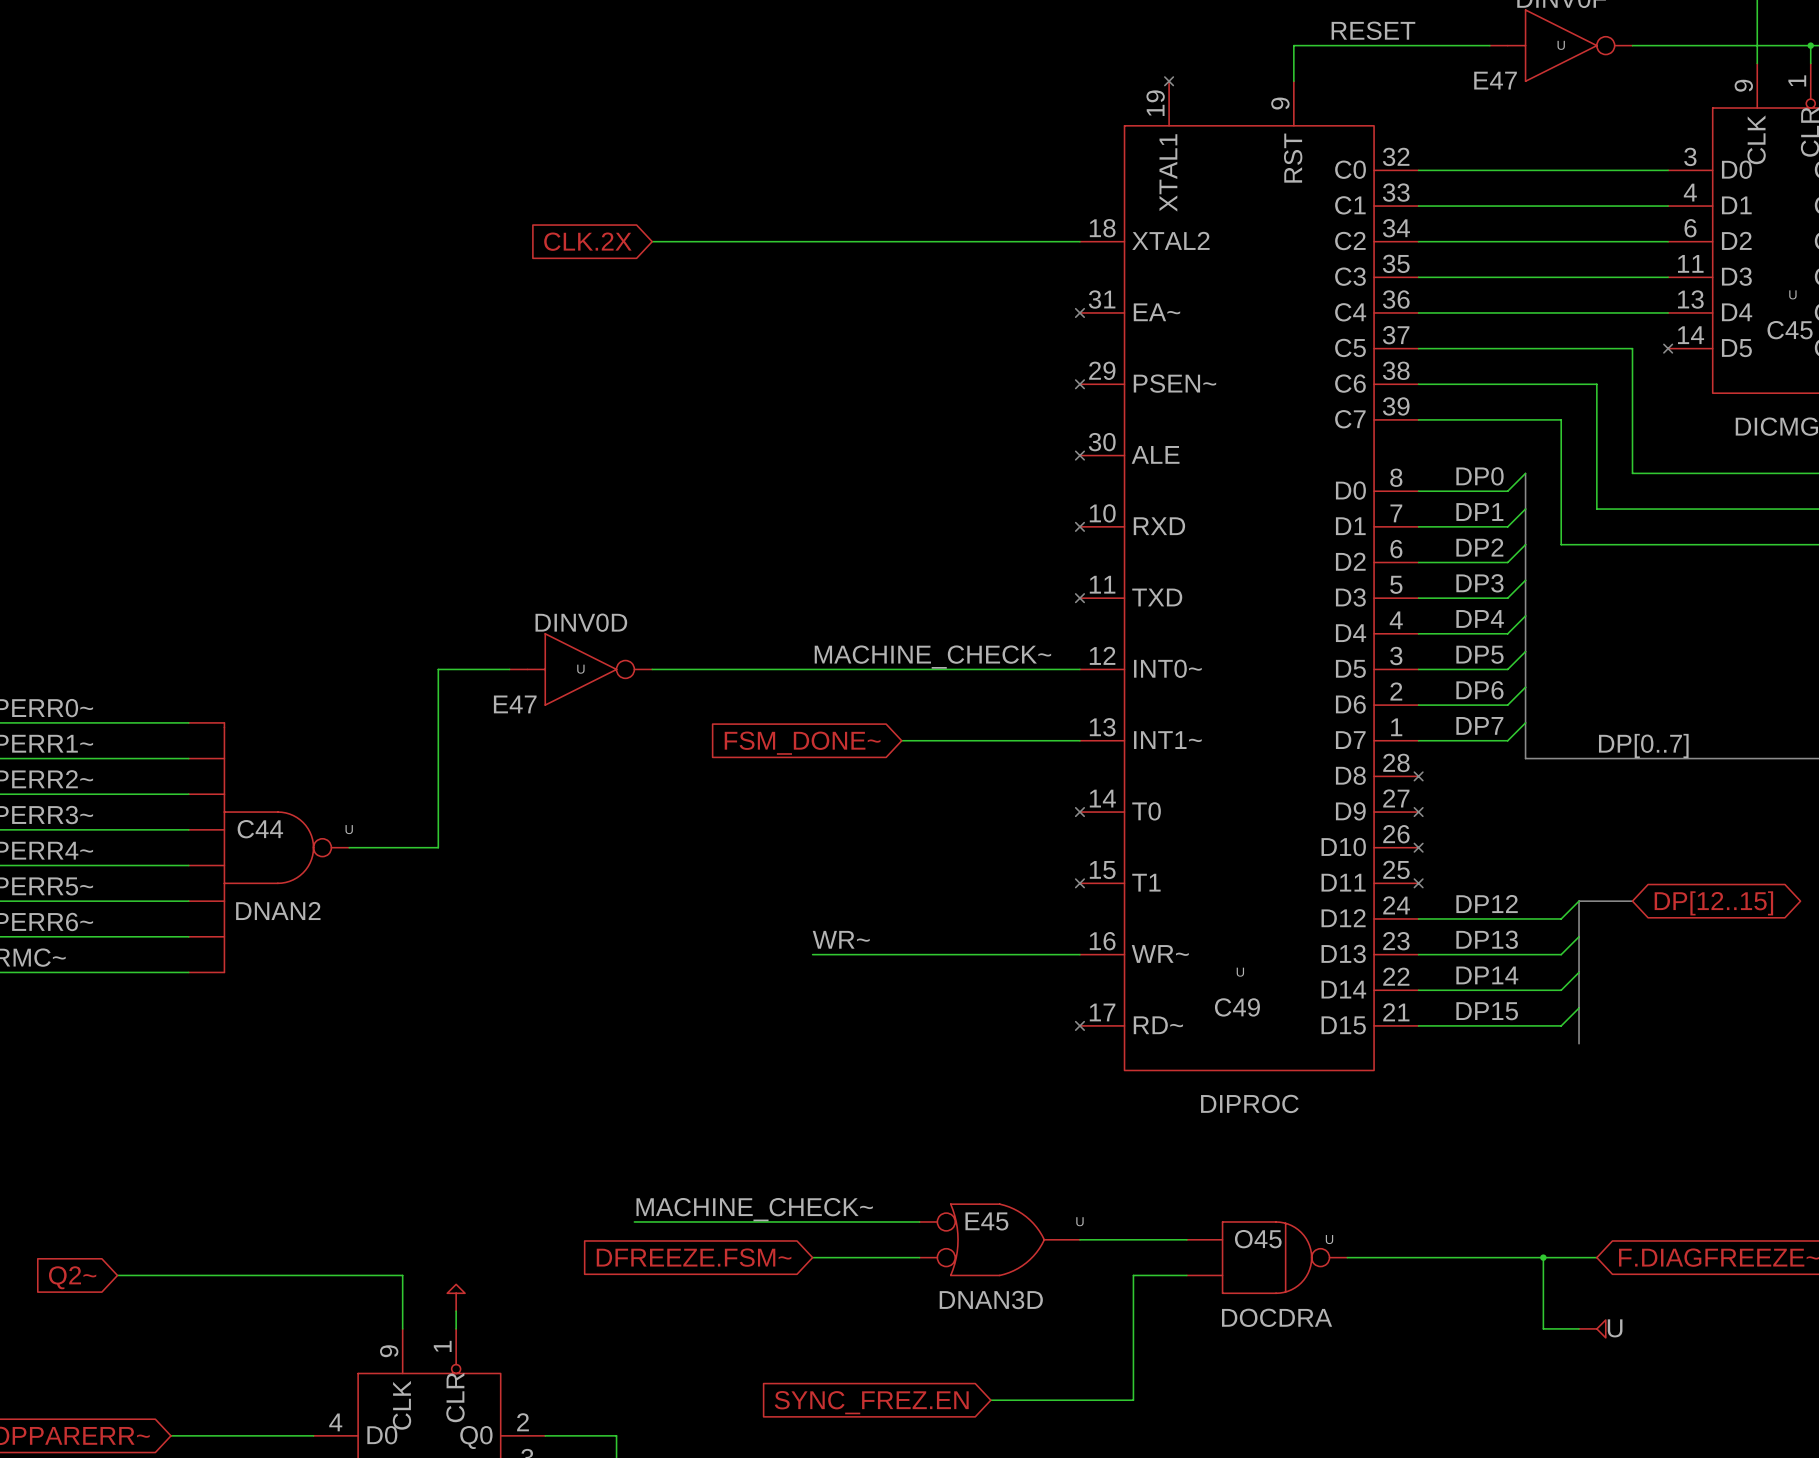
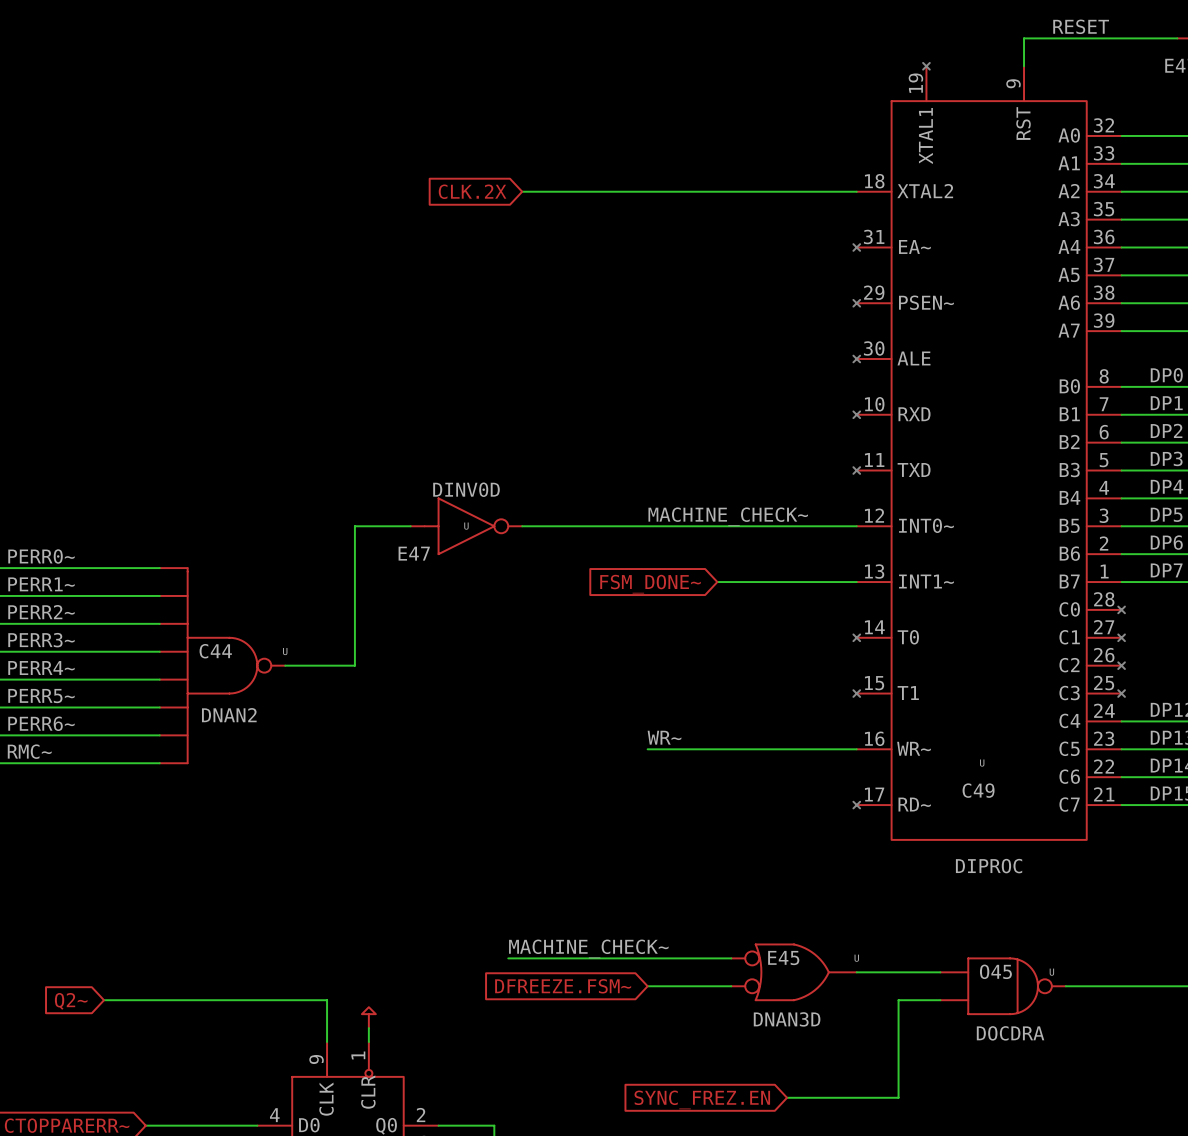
U symbol: [1079, 81, 1419, 1071] -> [856, 66, 1122, 840]

